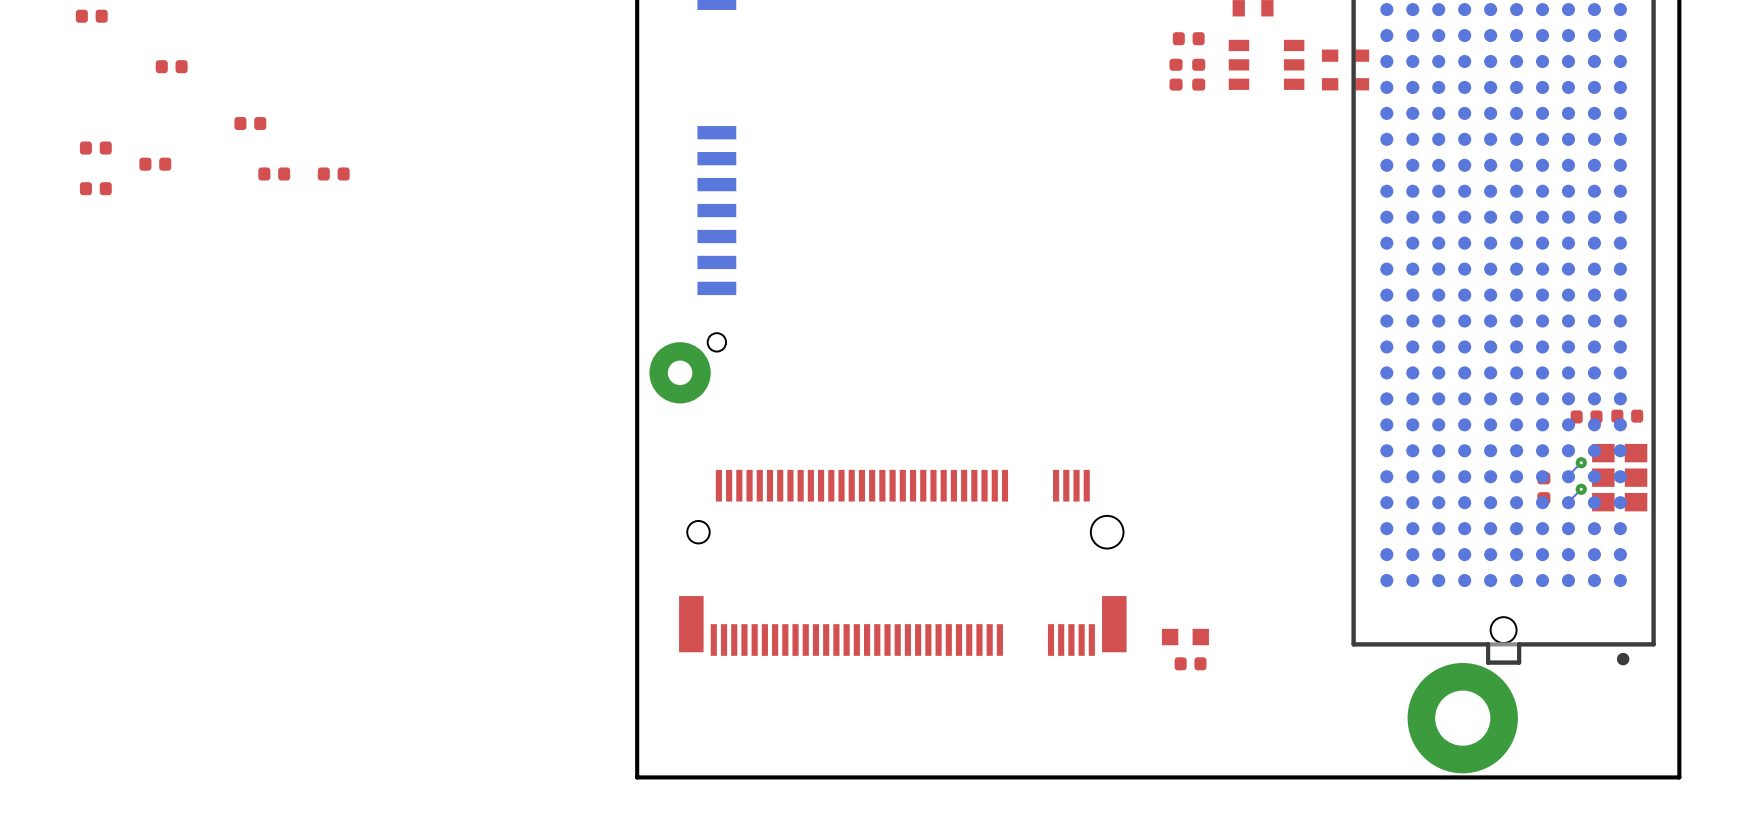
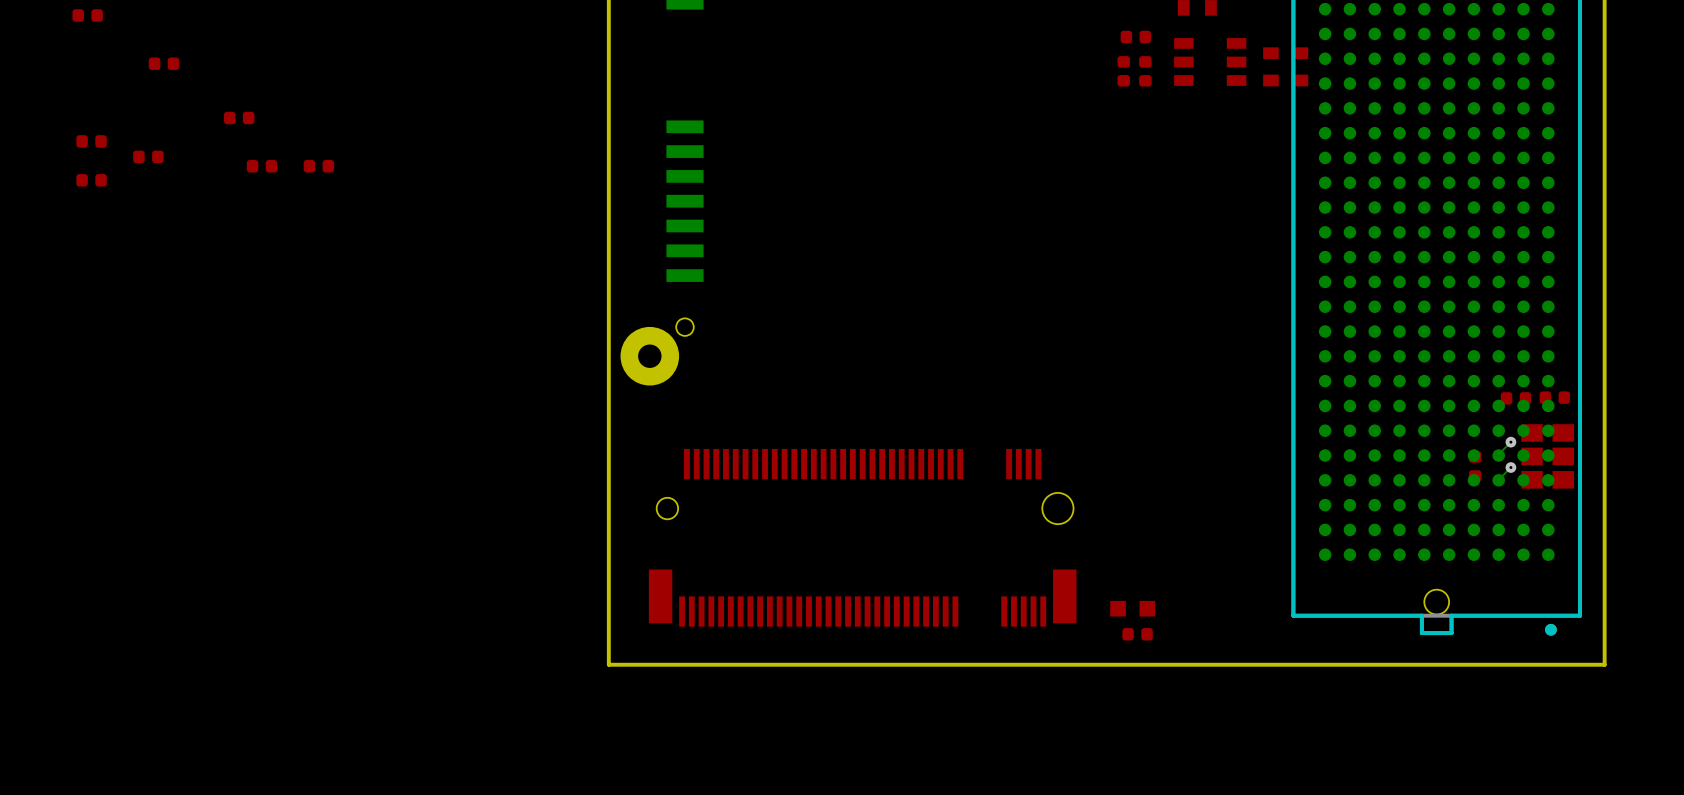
board edge: (1679, 695) (1679, 777) (637, 777) (637, 695) -> (1604, 664) (608, 664)
via: (1462, 718) -> none

